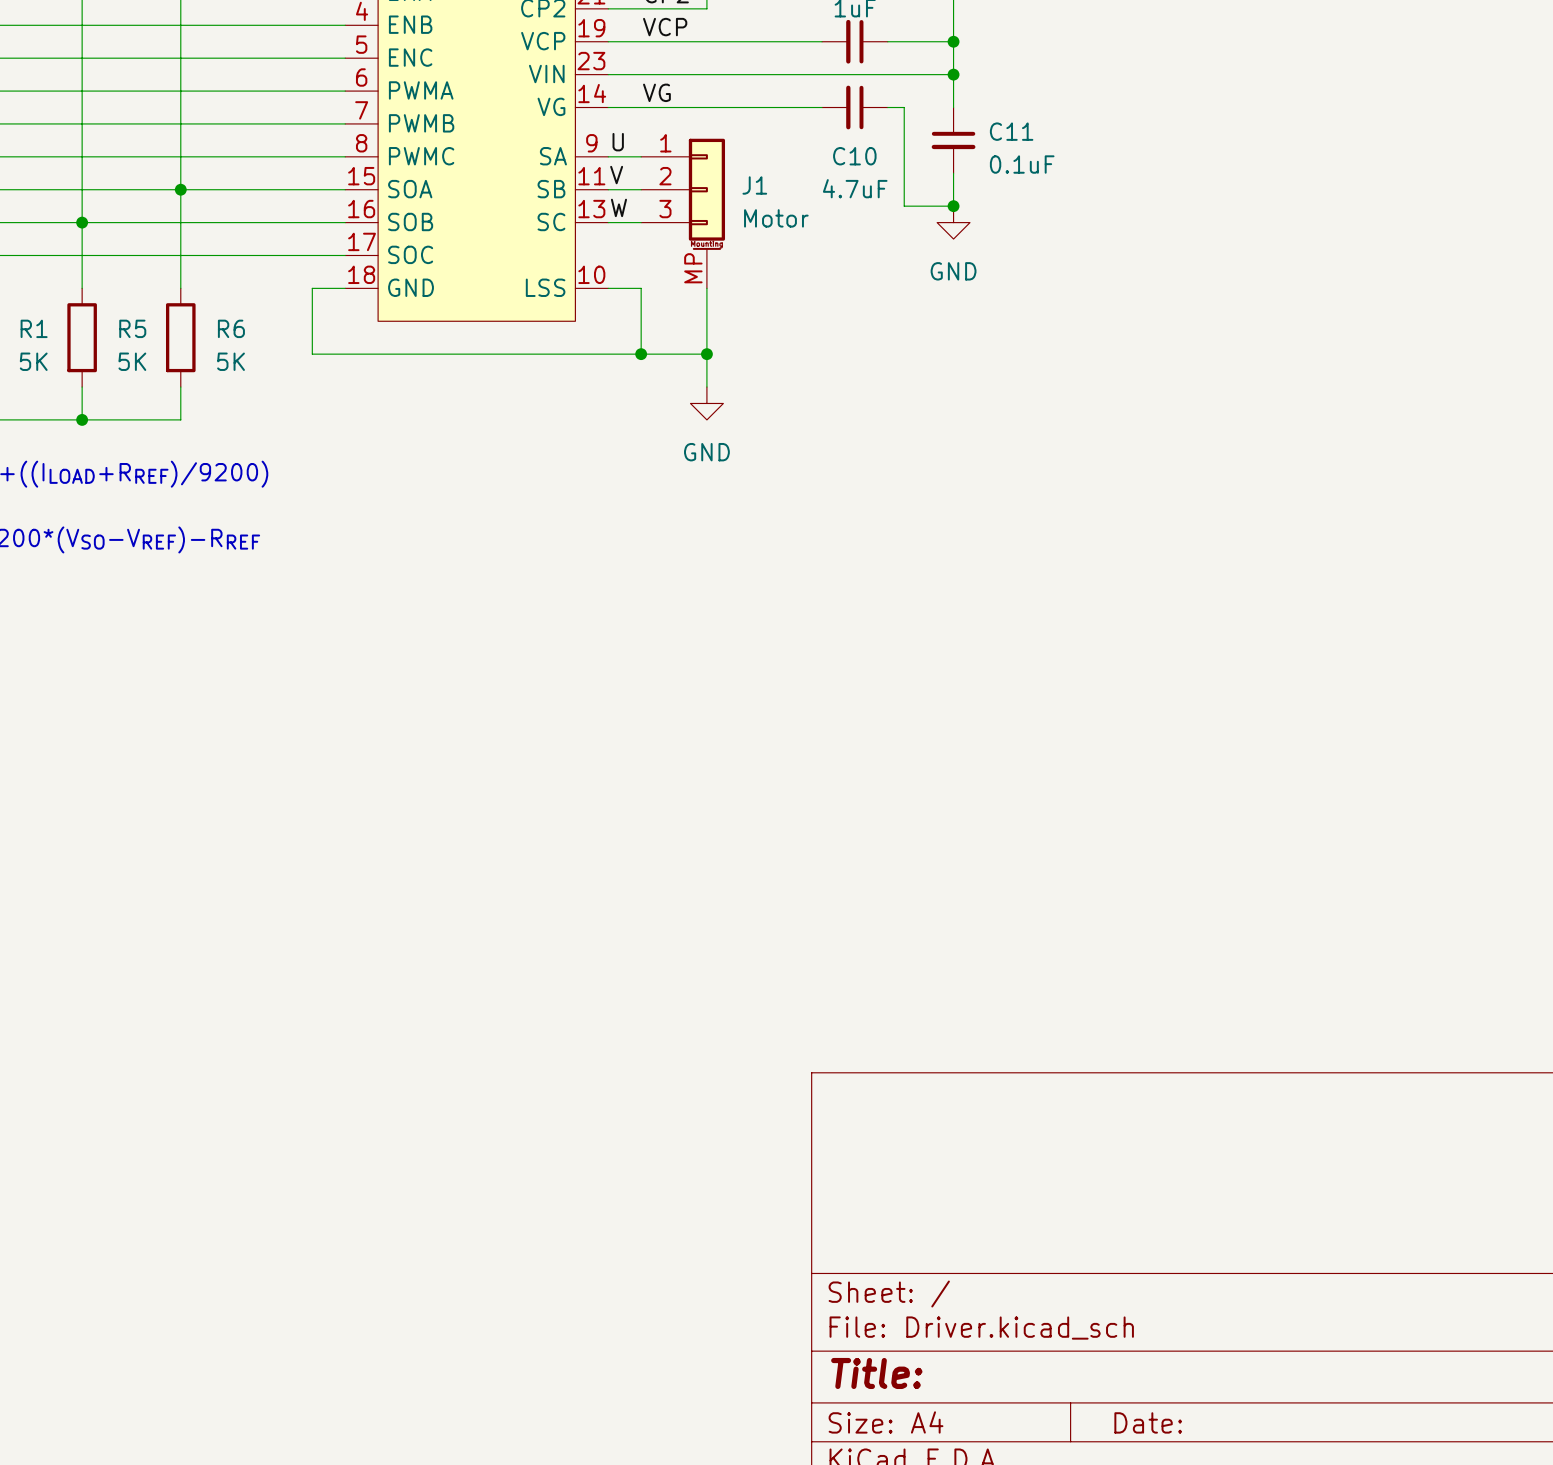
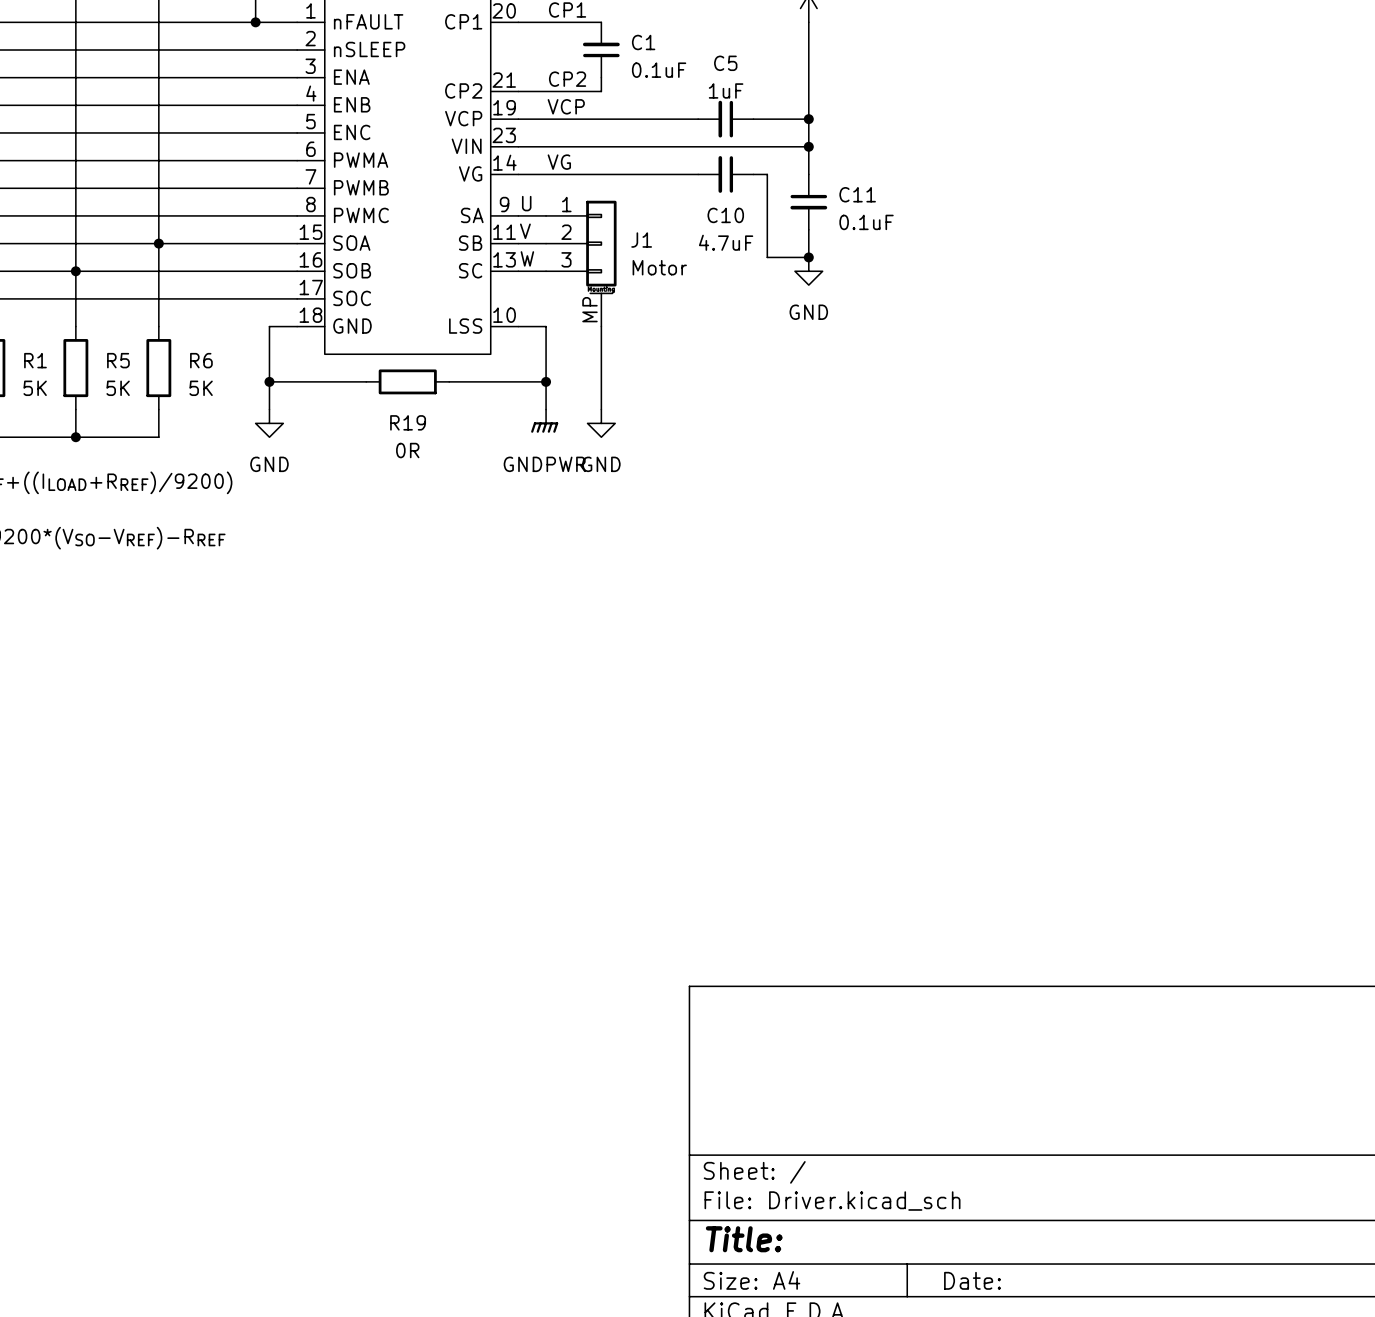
wire: none -> (269, 381) (269, 409)
junction: none -> (269, 381)
wire: (427, 354) (526, 354) -> none
R19: none -> 0R (407, 381)
wire: (641, 354) (706, 354) -> (546, 381) (546, 409)
junction: (706, 354) -> none
power symbol: none -> GNDPWR (544, 421)
power symbol: none -> GND (269, 423)

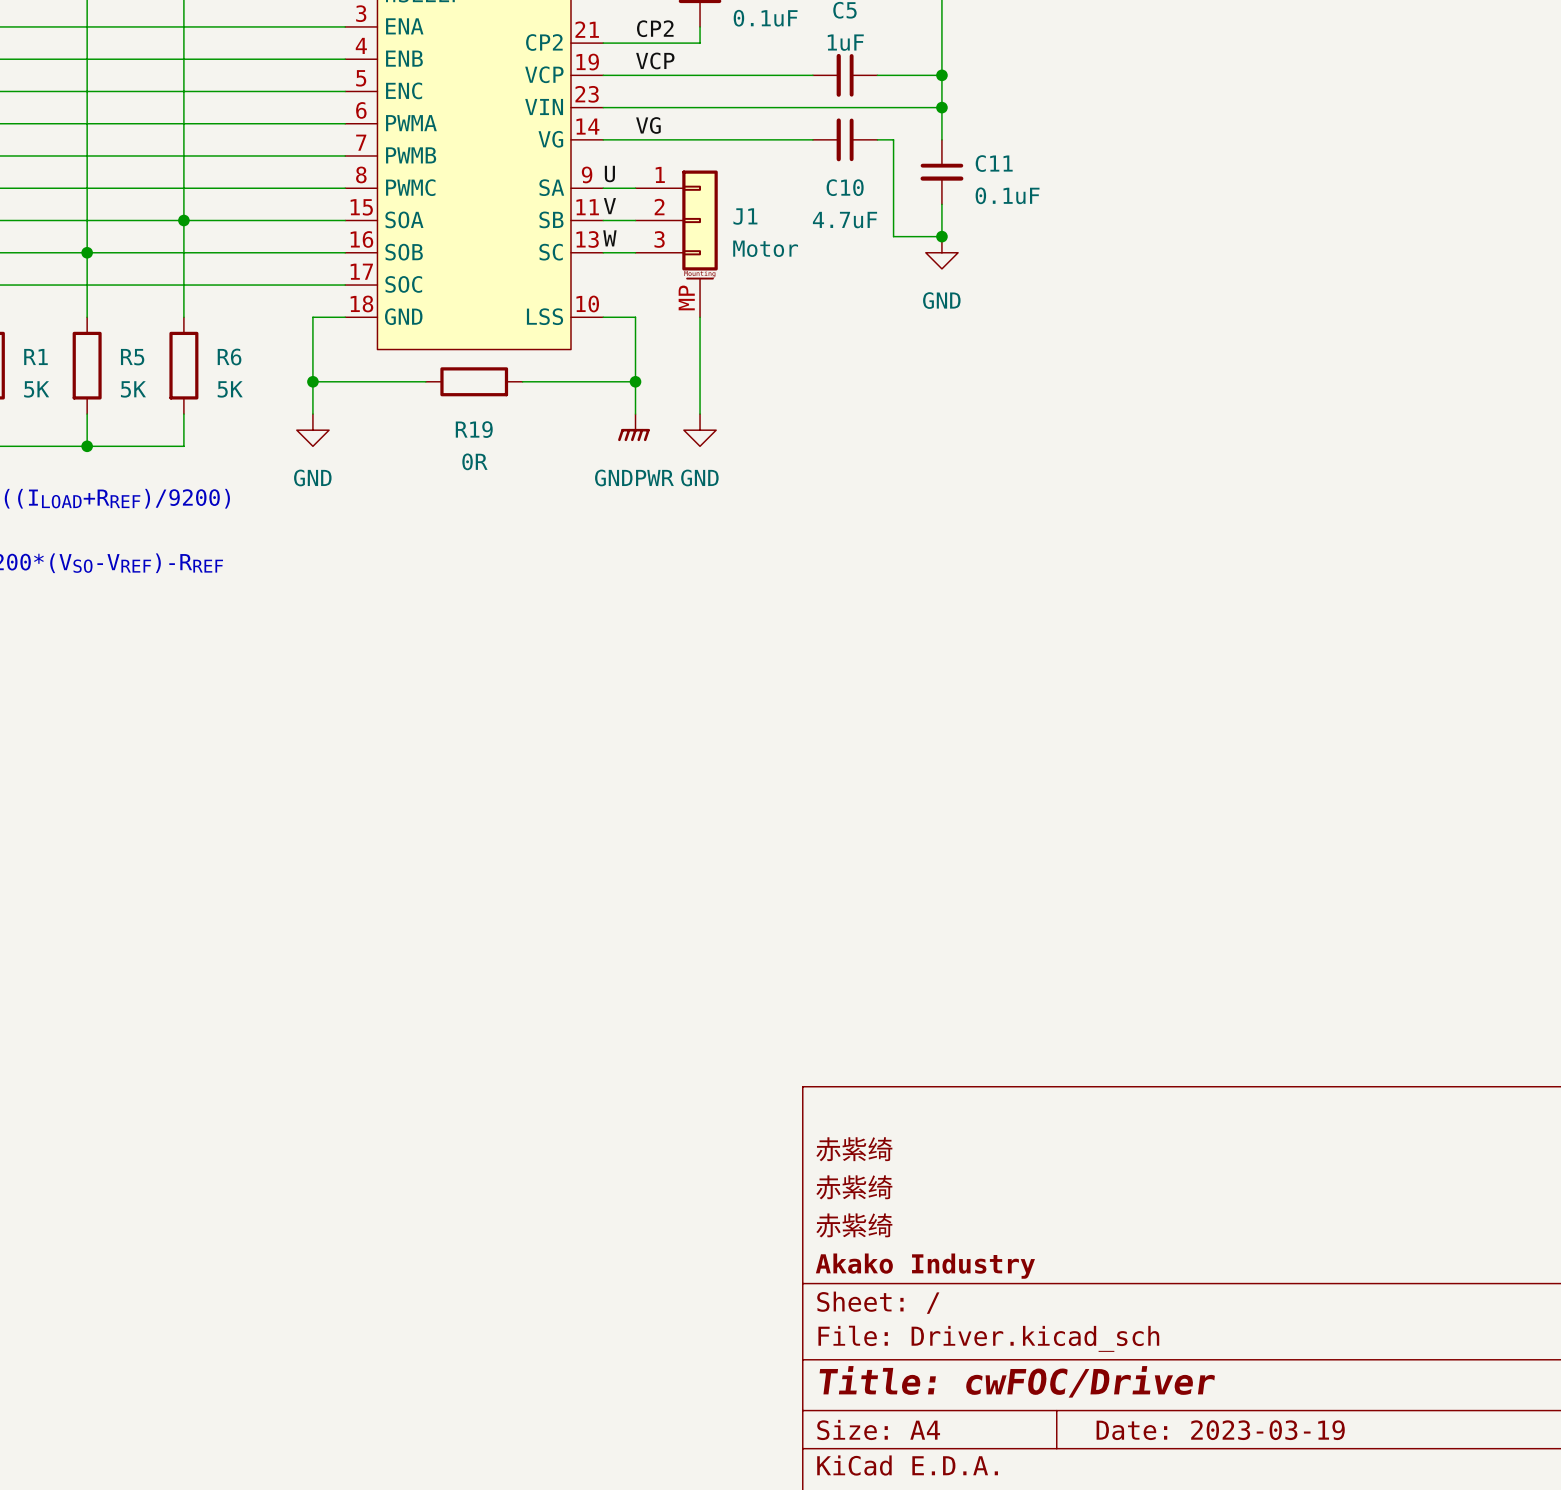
title block: none -> 赤紫绮 (854, 1149)
title block: none -> 赤紫绮 (854, 1187)
title block: none -> 赤紫绮 (854, 1225)
title block: none -> Akako Industry (925, 1266)
title block: Title: (744, 1239) -> Title: cwFOC/Driver (1017, 1381)
title block: Date: (972, 1280) -> Date: 2023-03-19 (1220, 1430)

